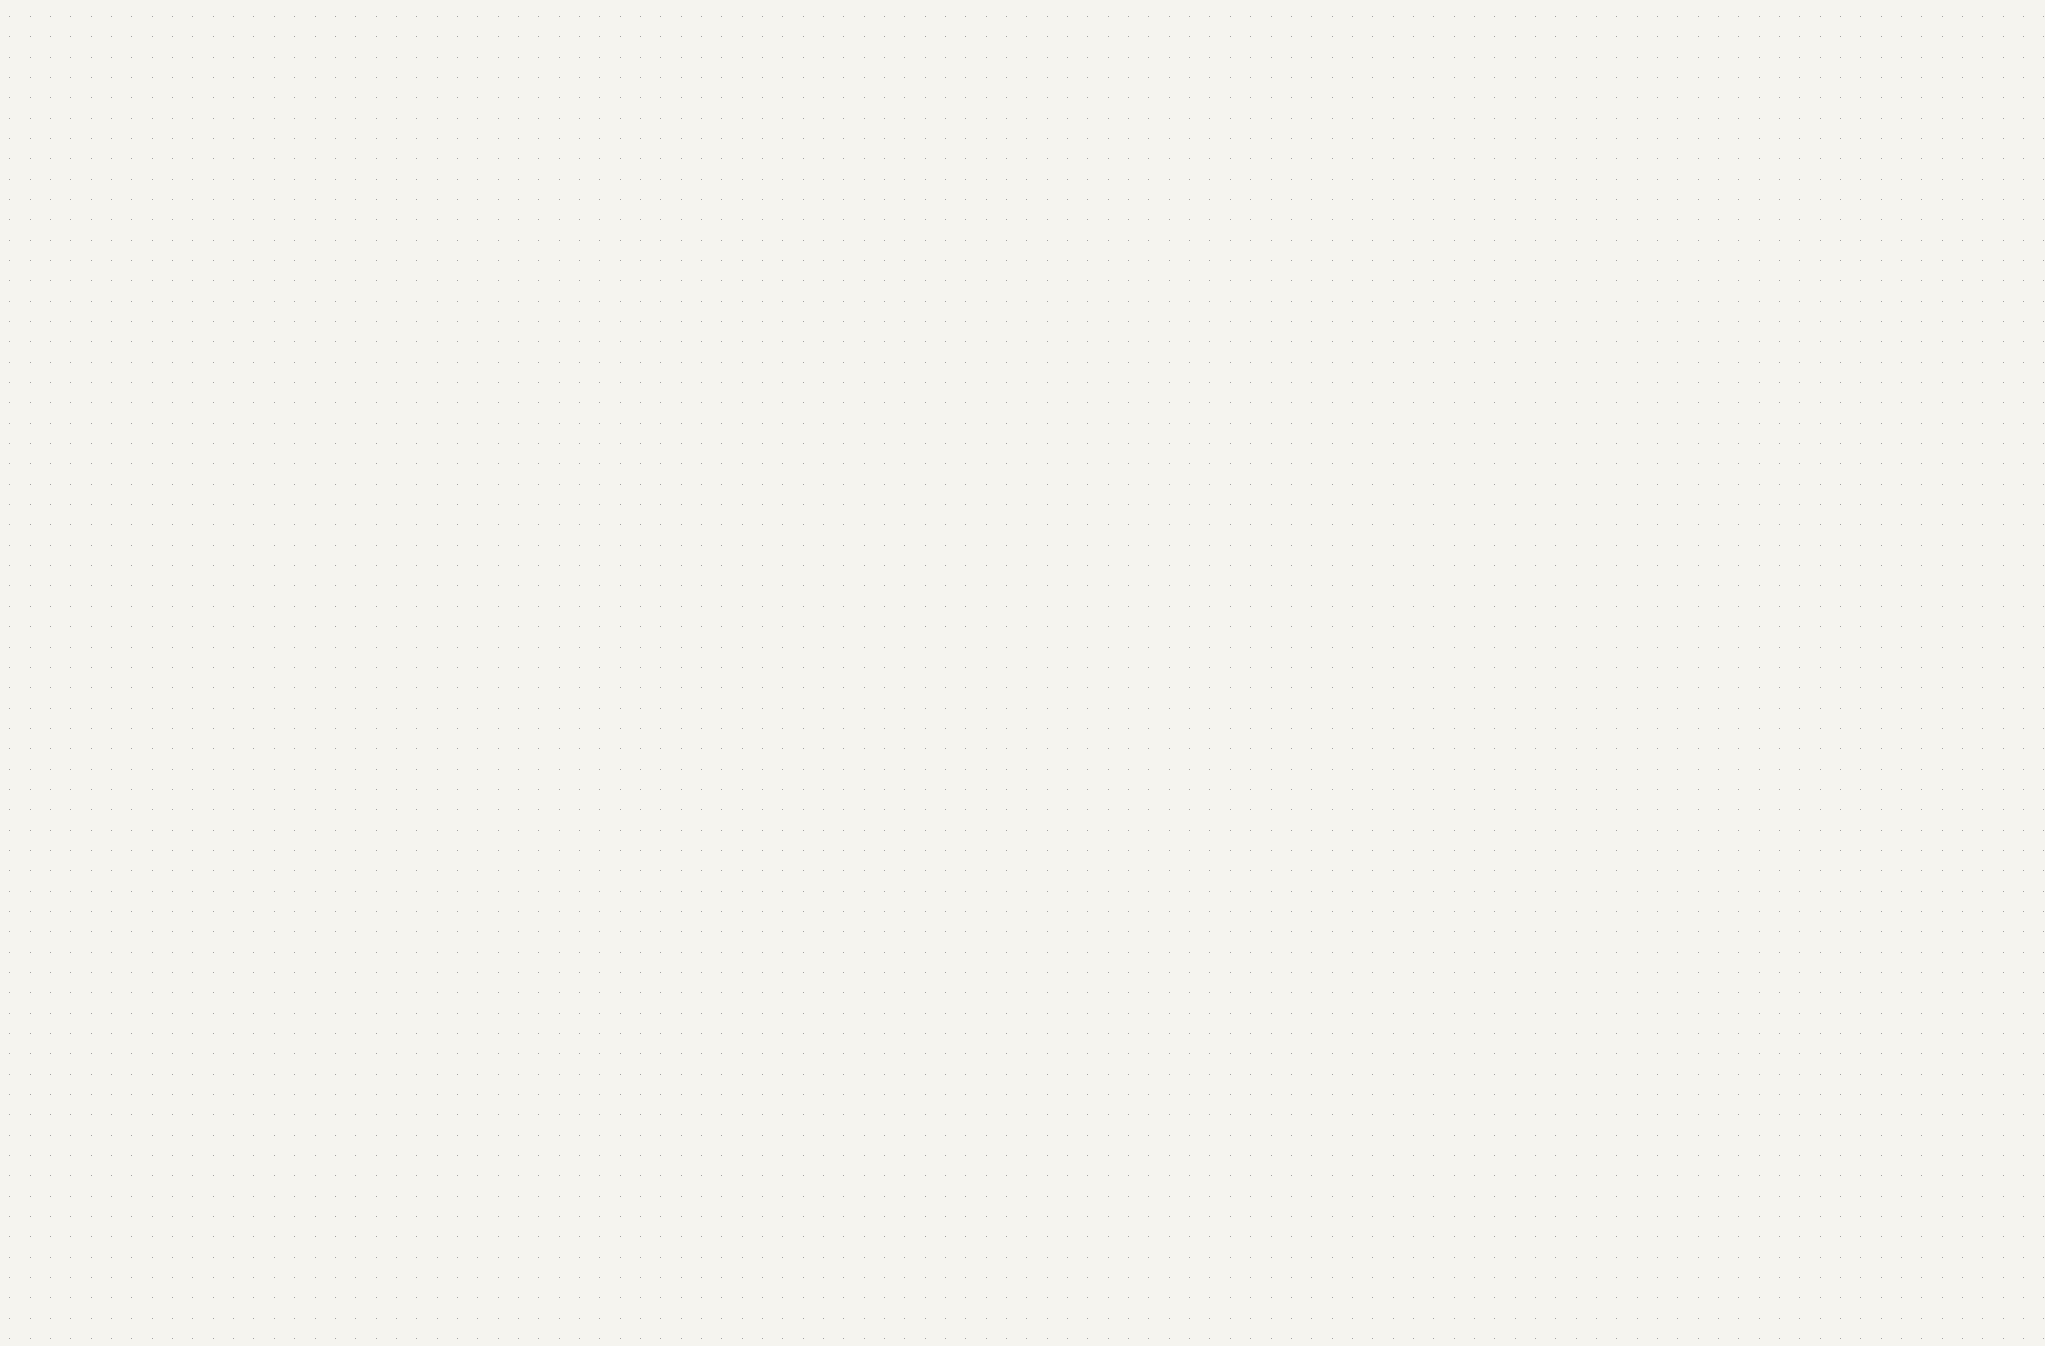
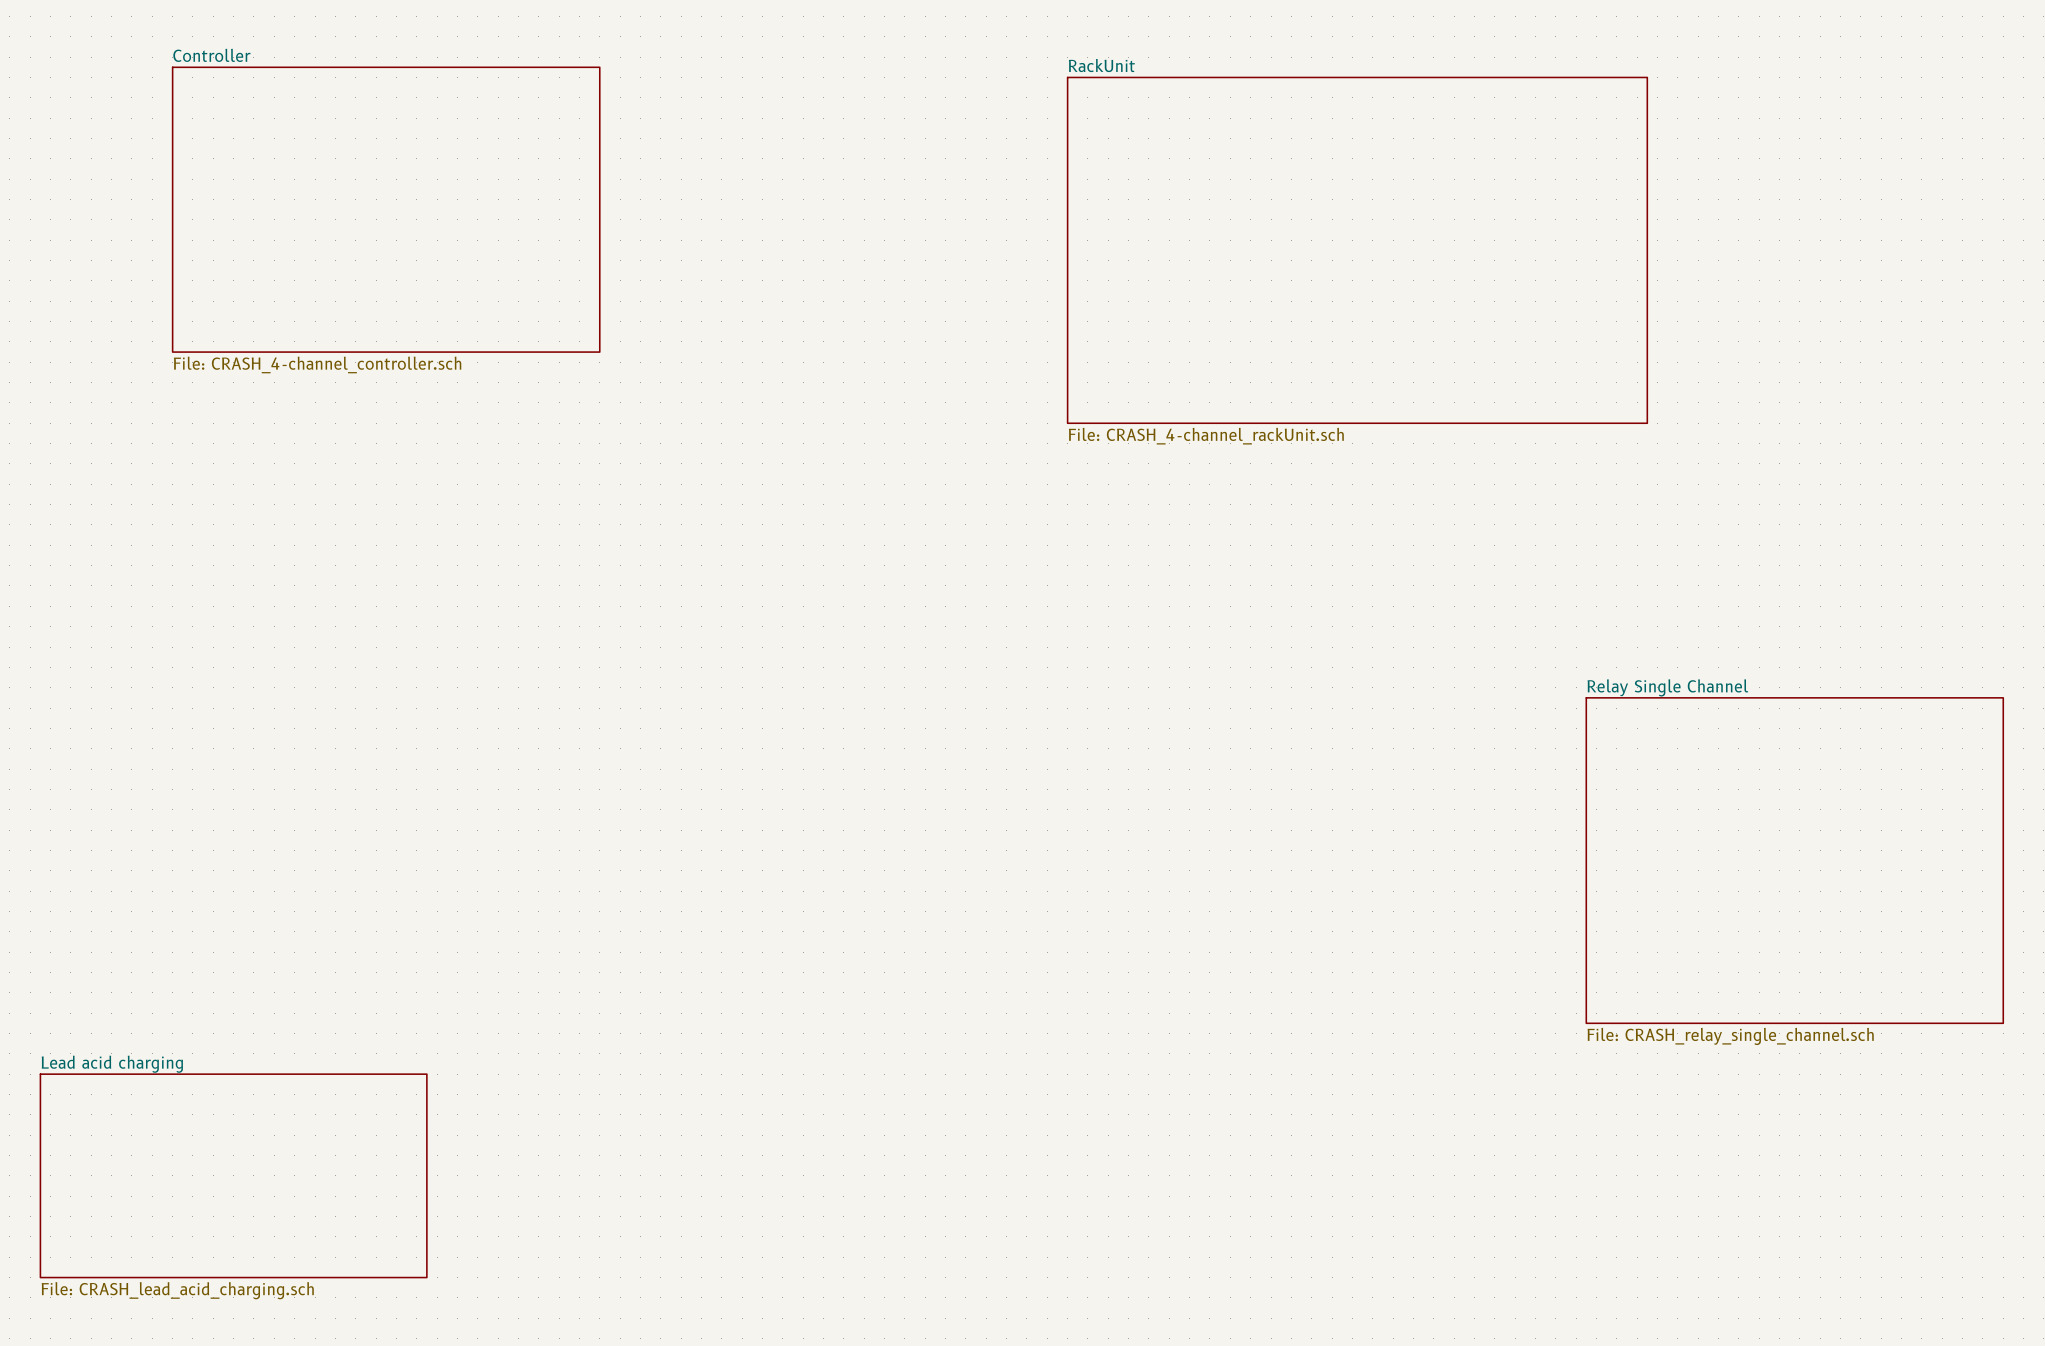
sheet Controller: none -> File: CRASH_4-channel_controller.sch (386, 209)
sheet RackUnit: none -> File: CRASH_4-channel_rackUnit.sch (1357, 250)
sheet Relay Single Channel: none -> File: CRASH_relay_single_channel.sch (1794, 860)
sheet Lead acid charging: none -> File: CRASH_lead_acid_charging.sch (233, 1175)

